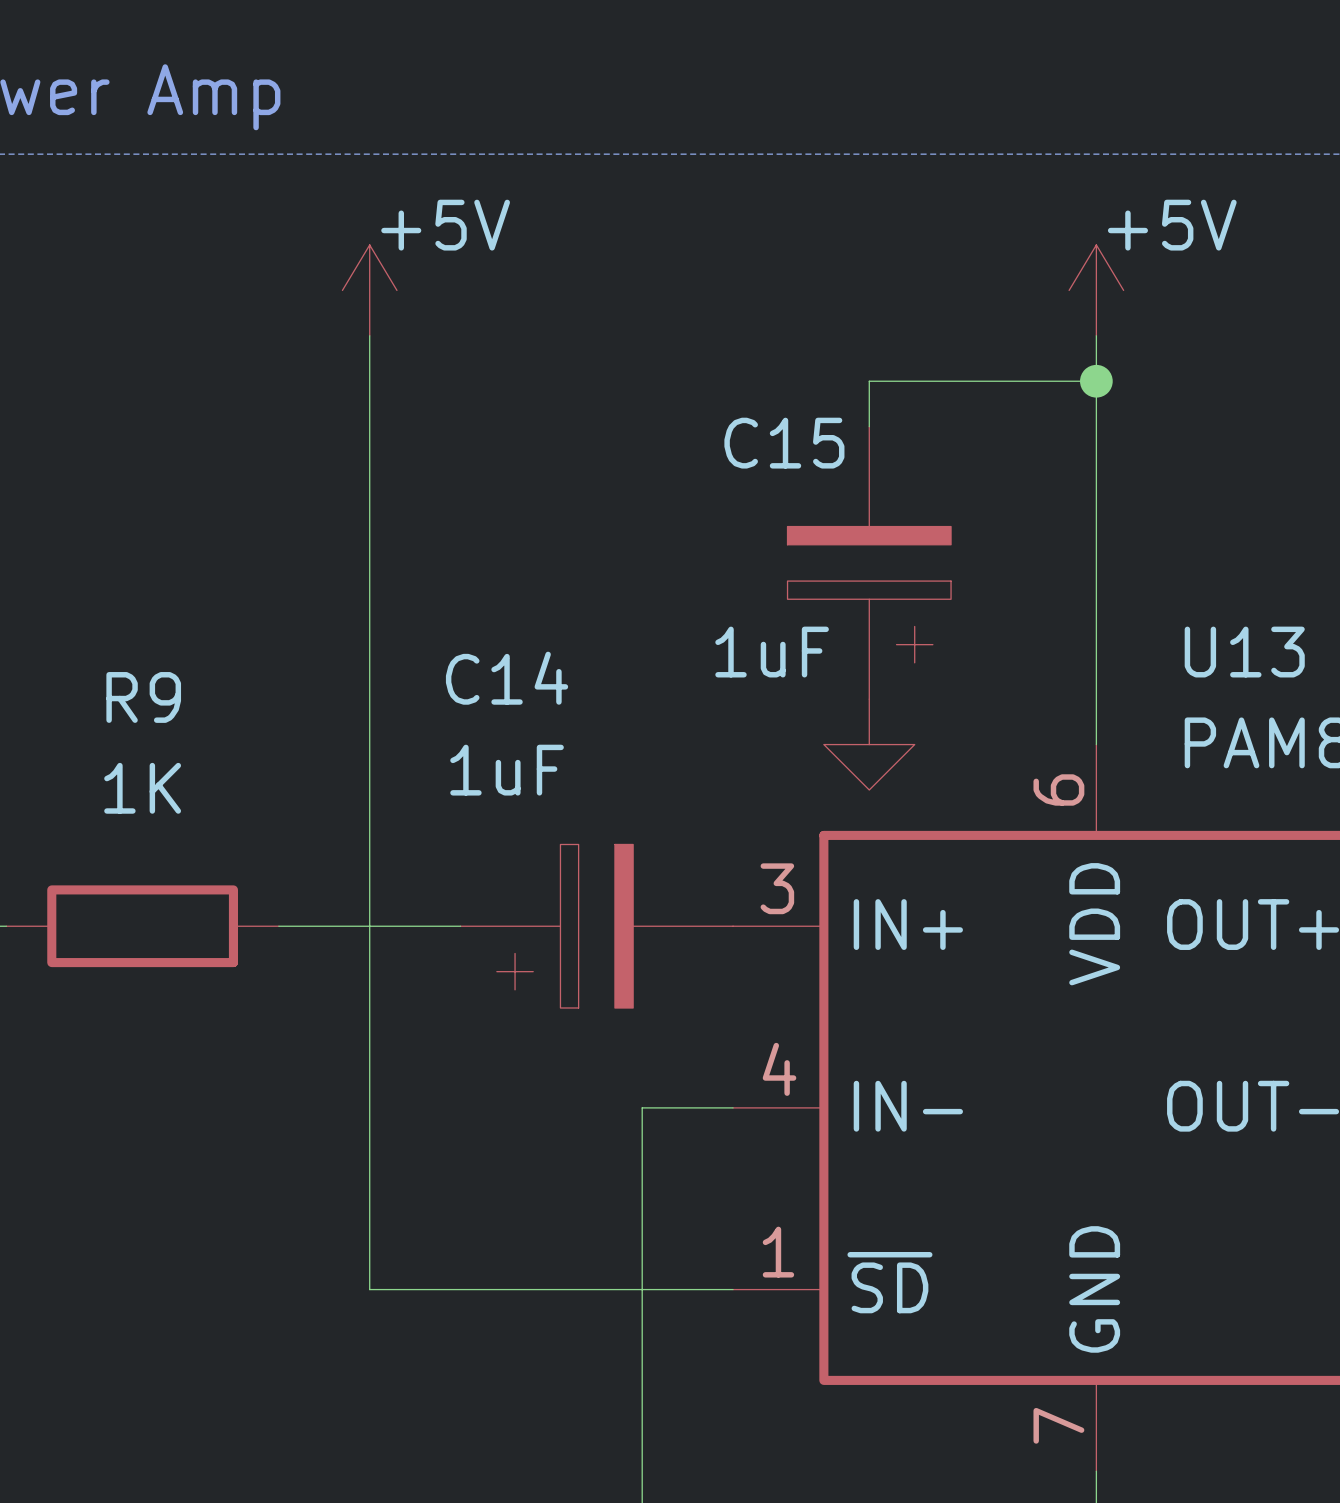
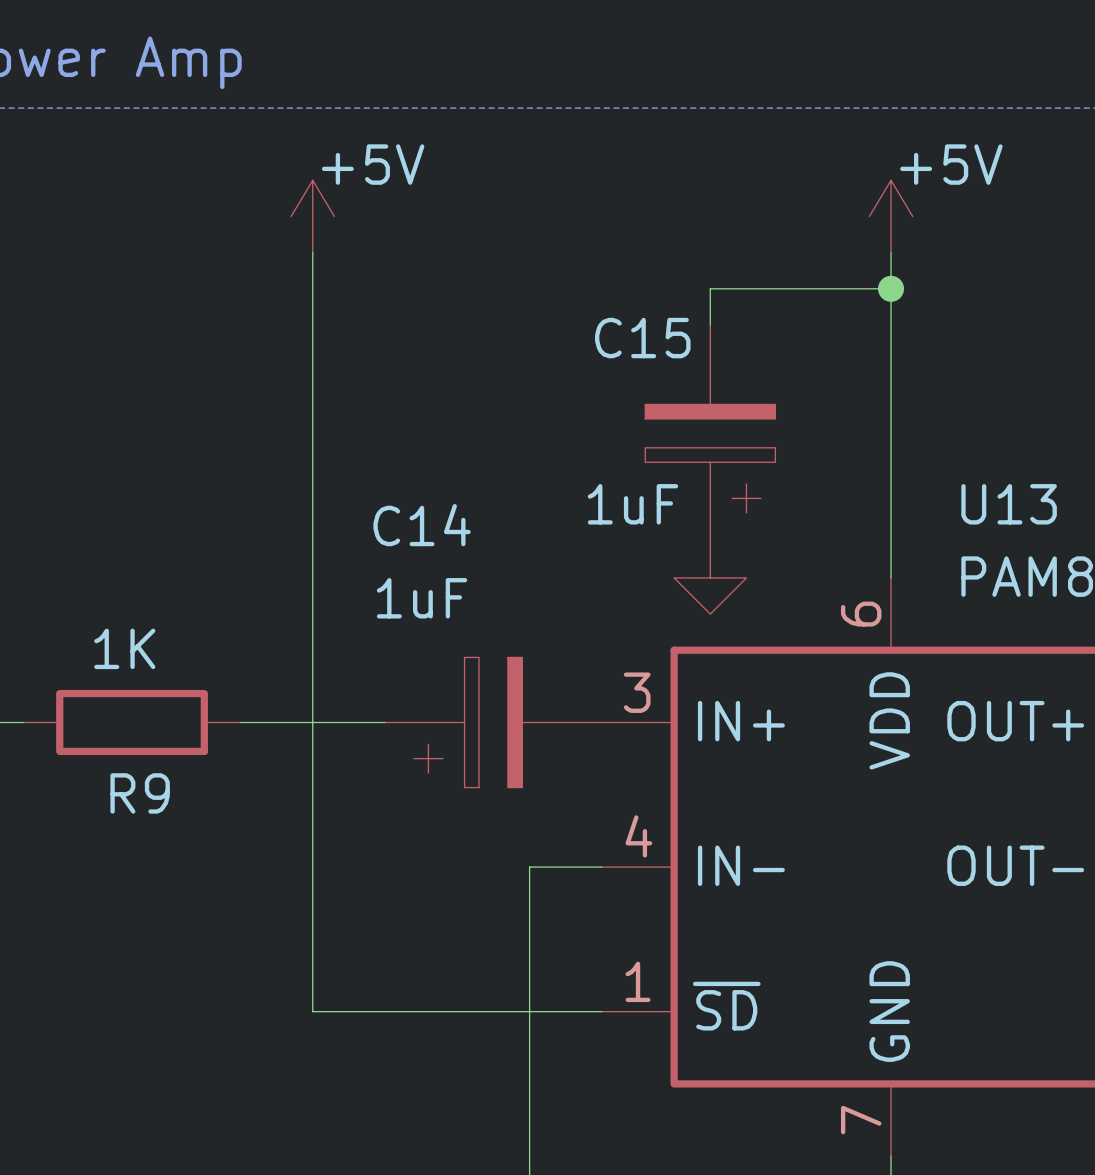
R9 name position: R9 (143, 697) -> R9 (140, 793)
R9 value position: 1K (142, 788) -> 1K (124, 648)

